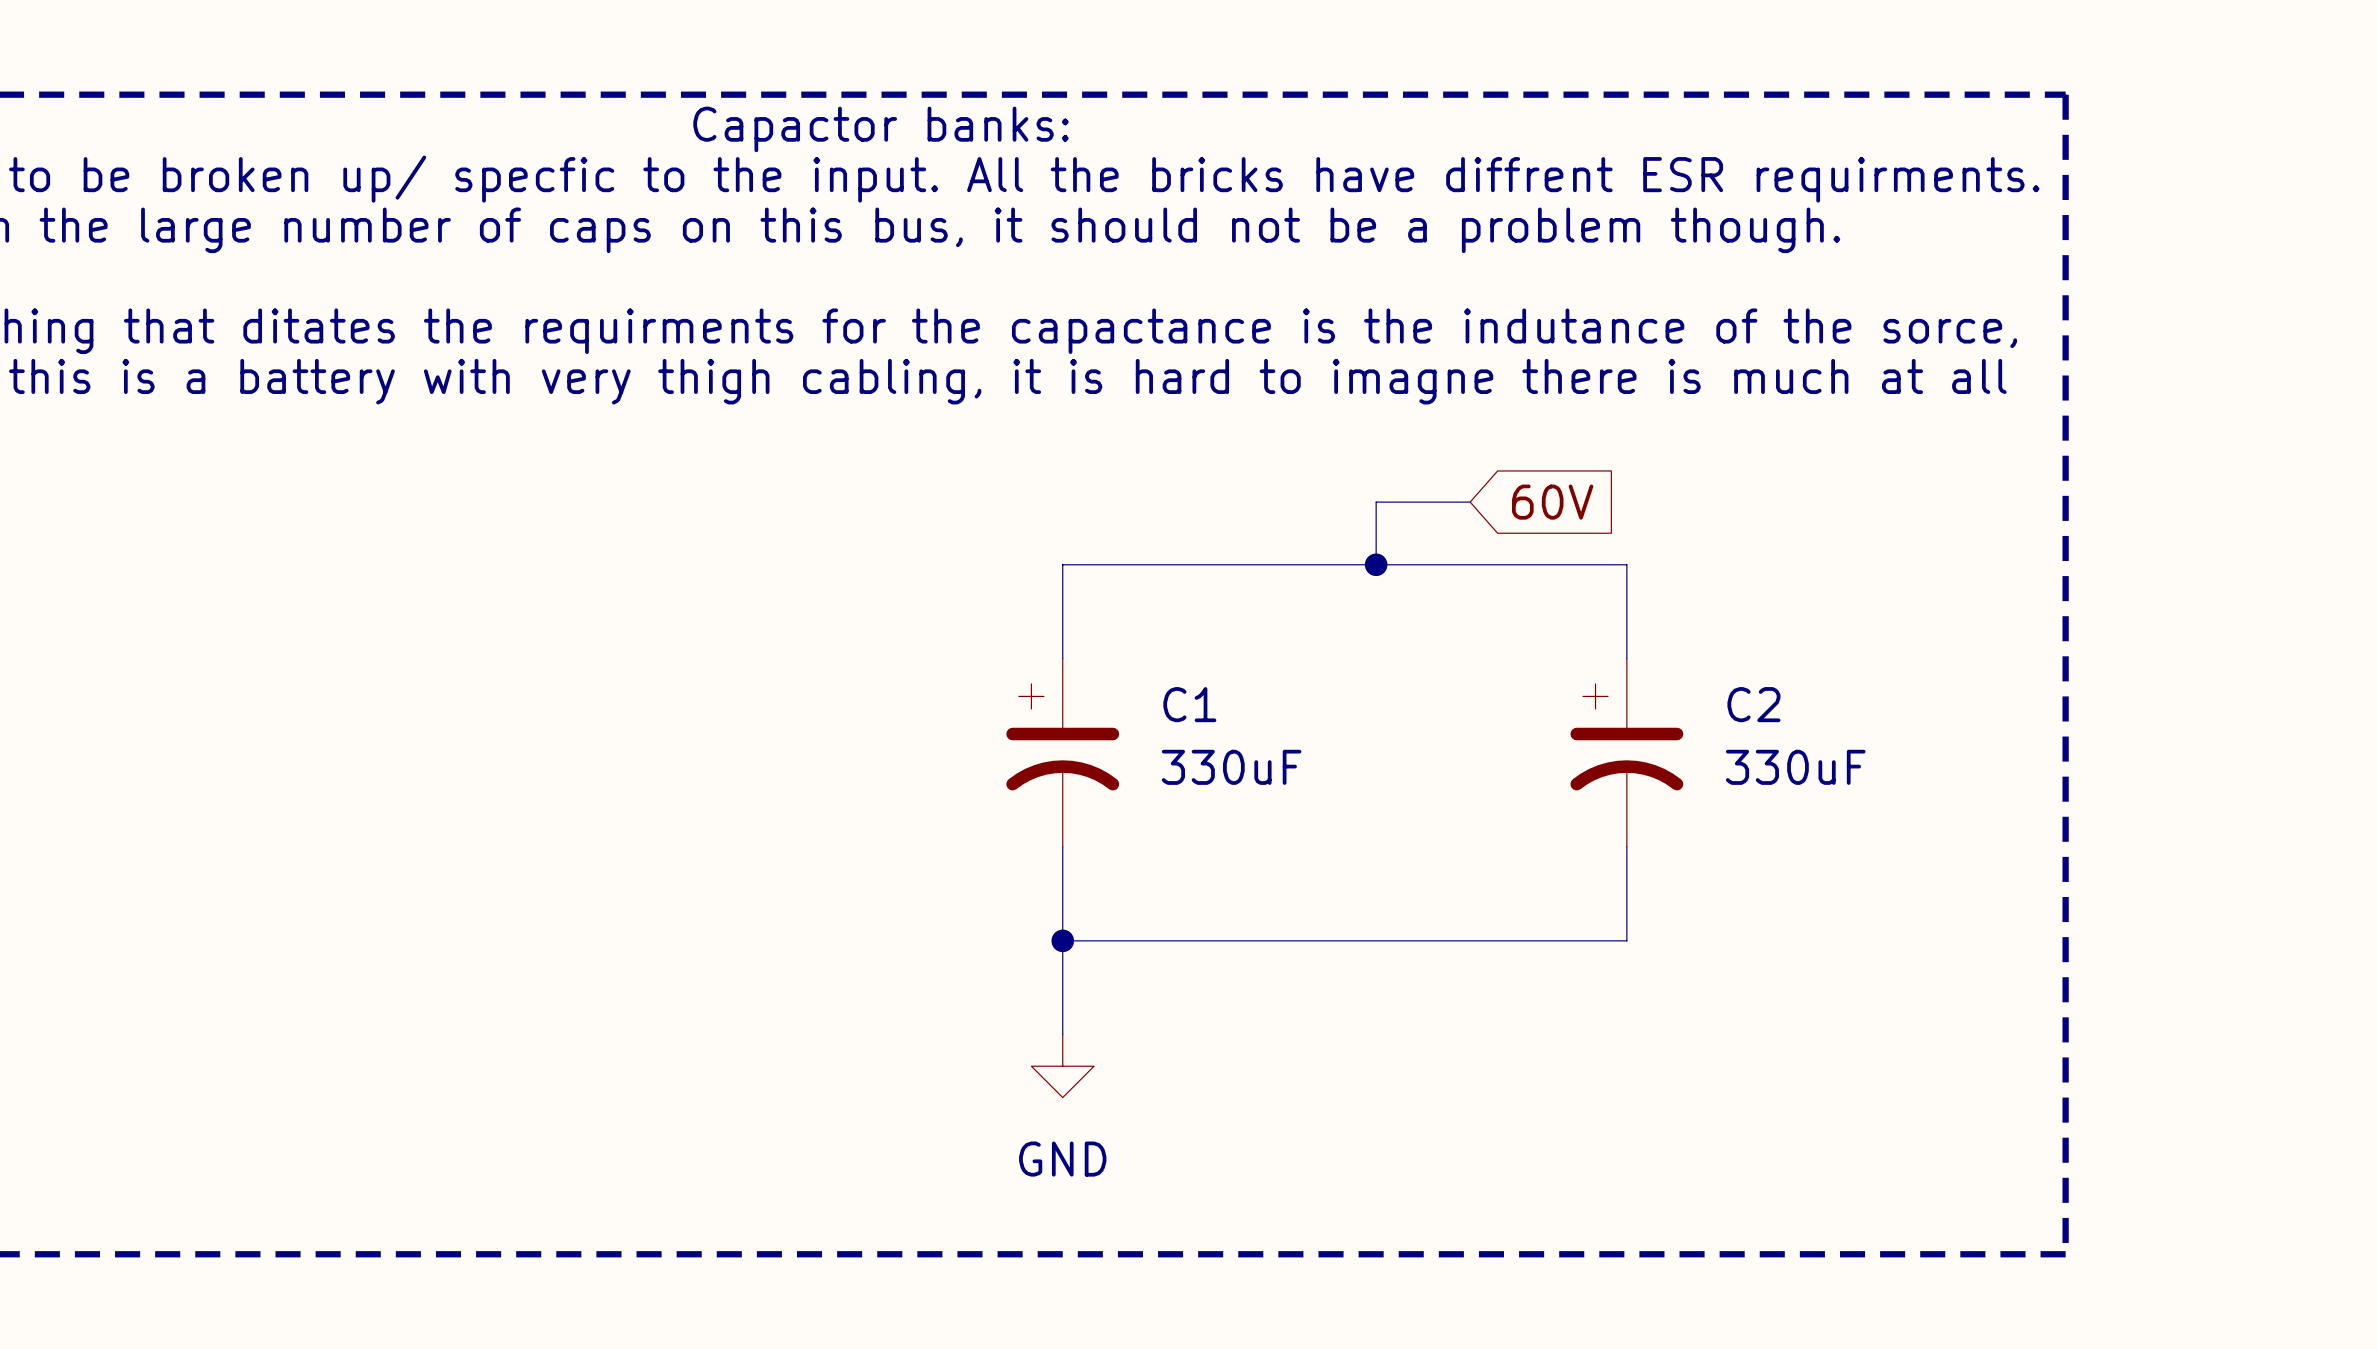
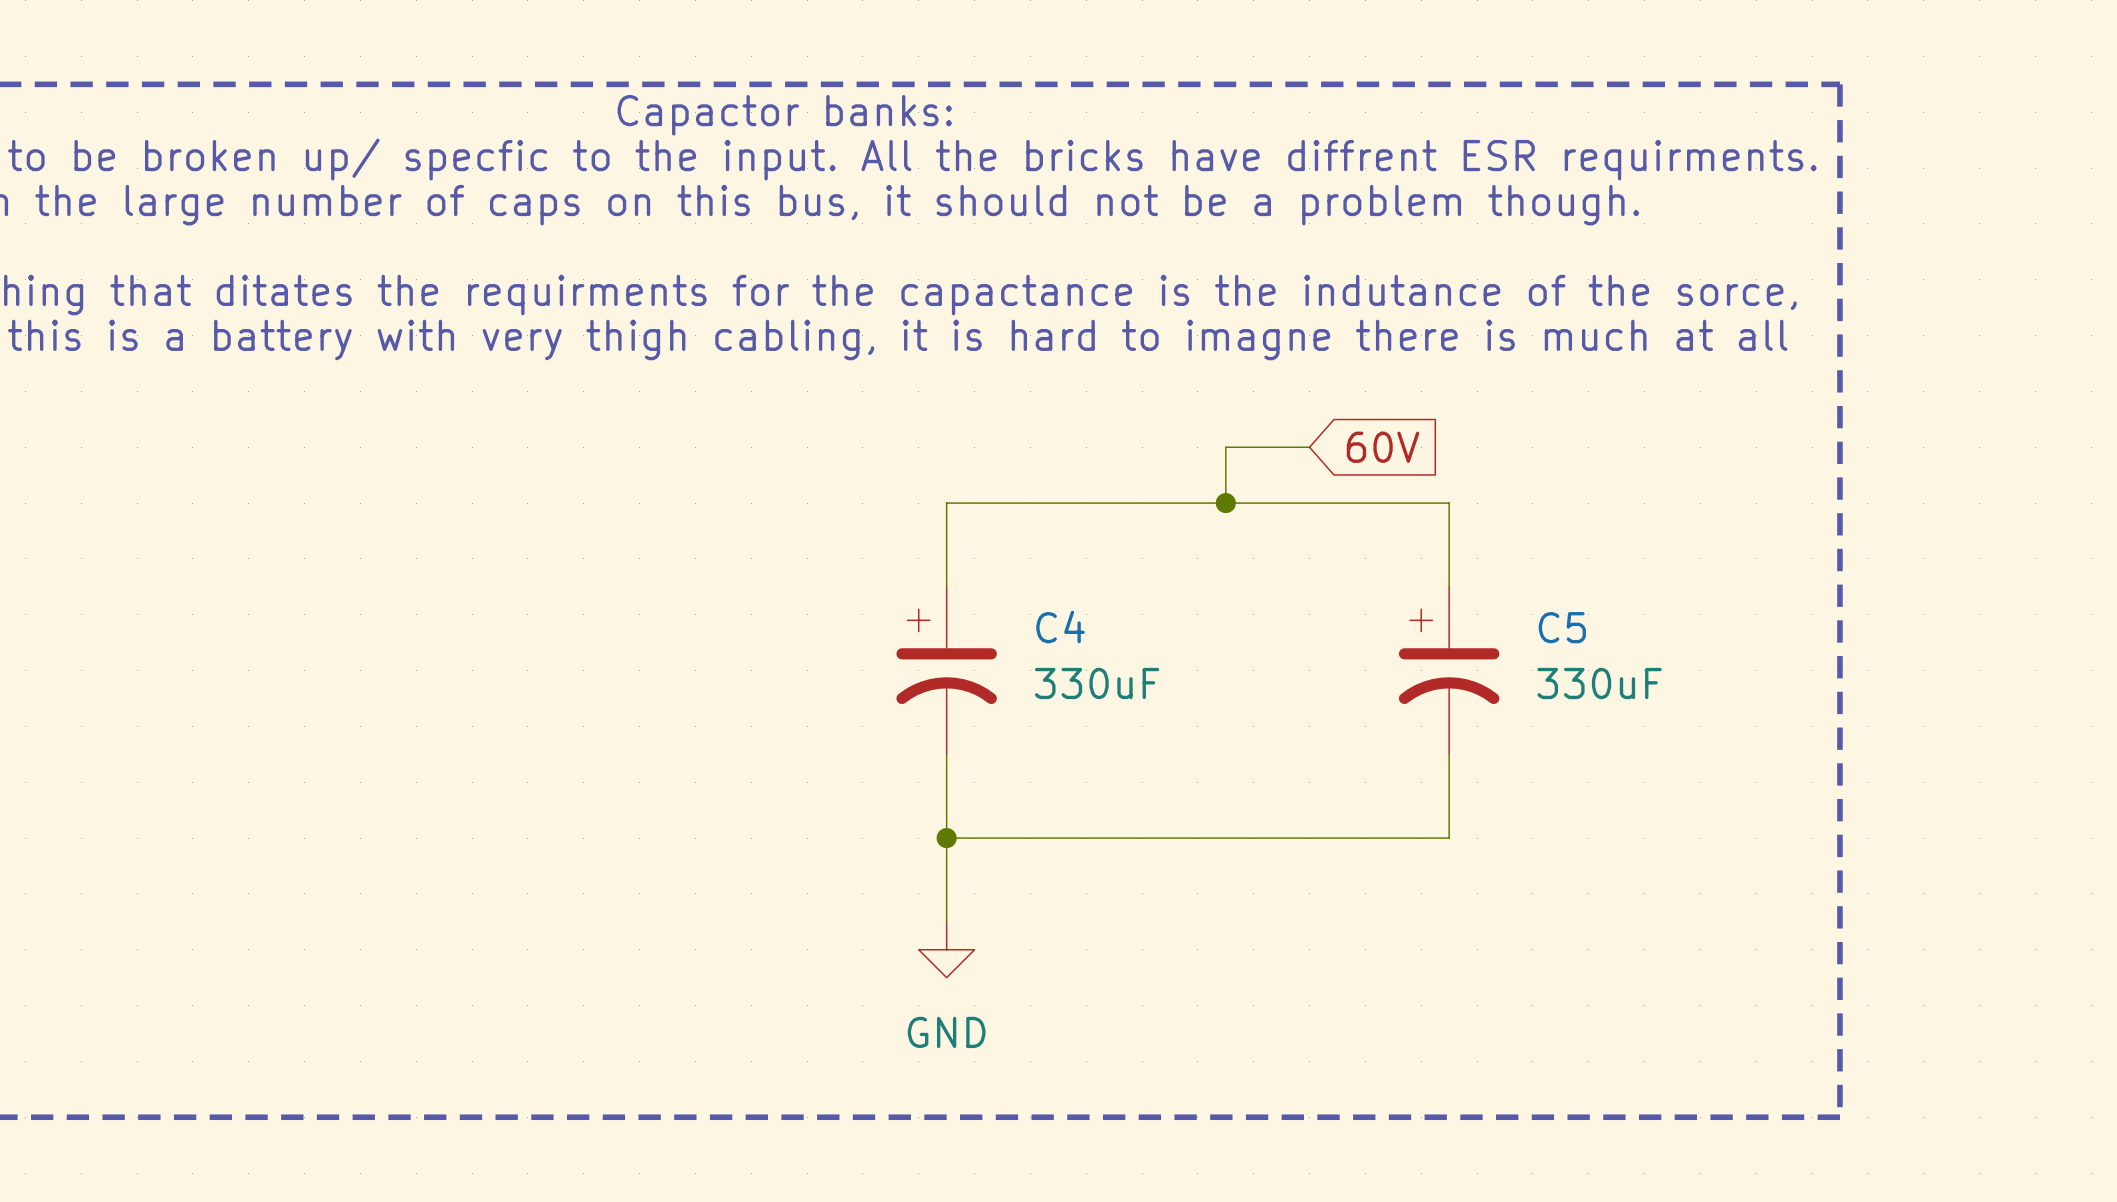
C1 name: C1 (1189, 704) -> C4 (1060, 626)
C2 name: C2 (1753, 704) -> C5 (1562, 627)

